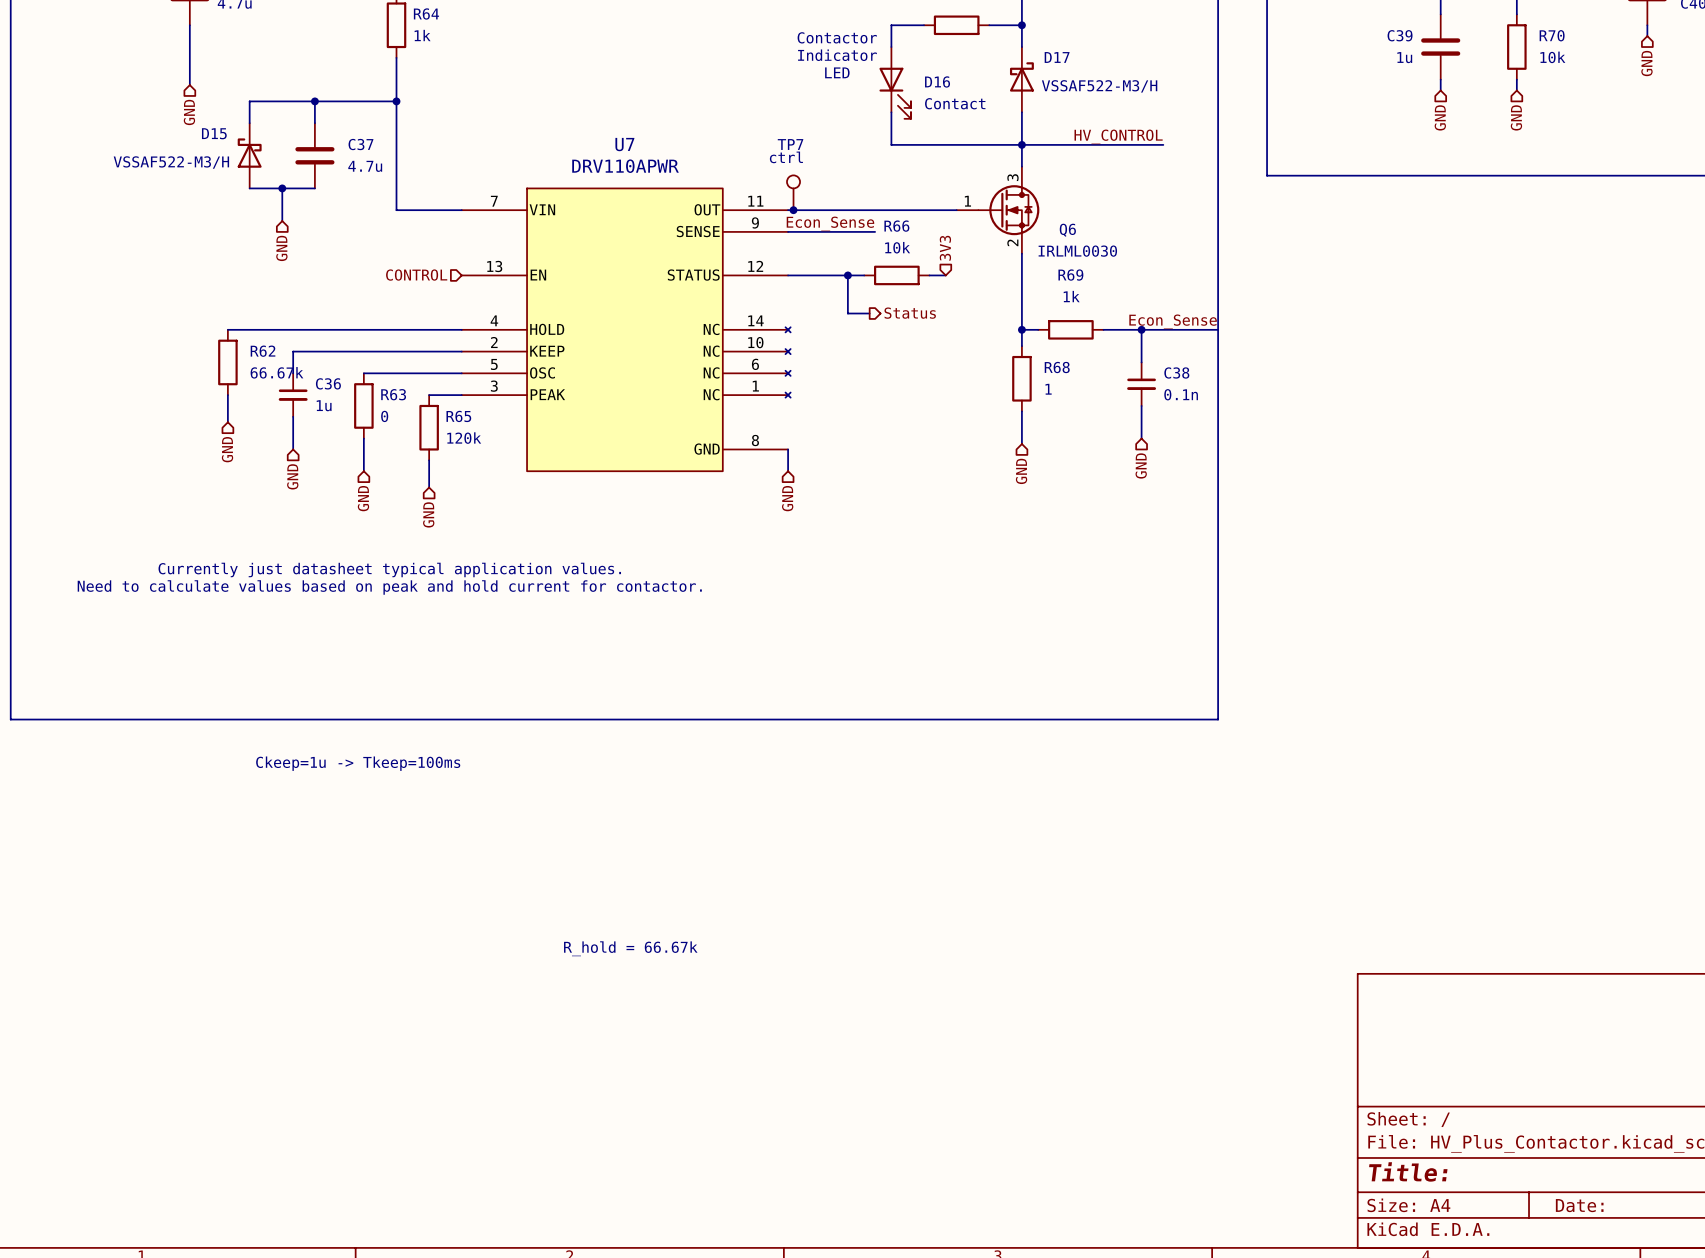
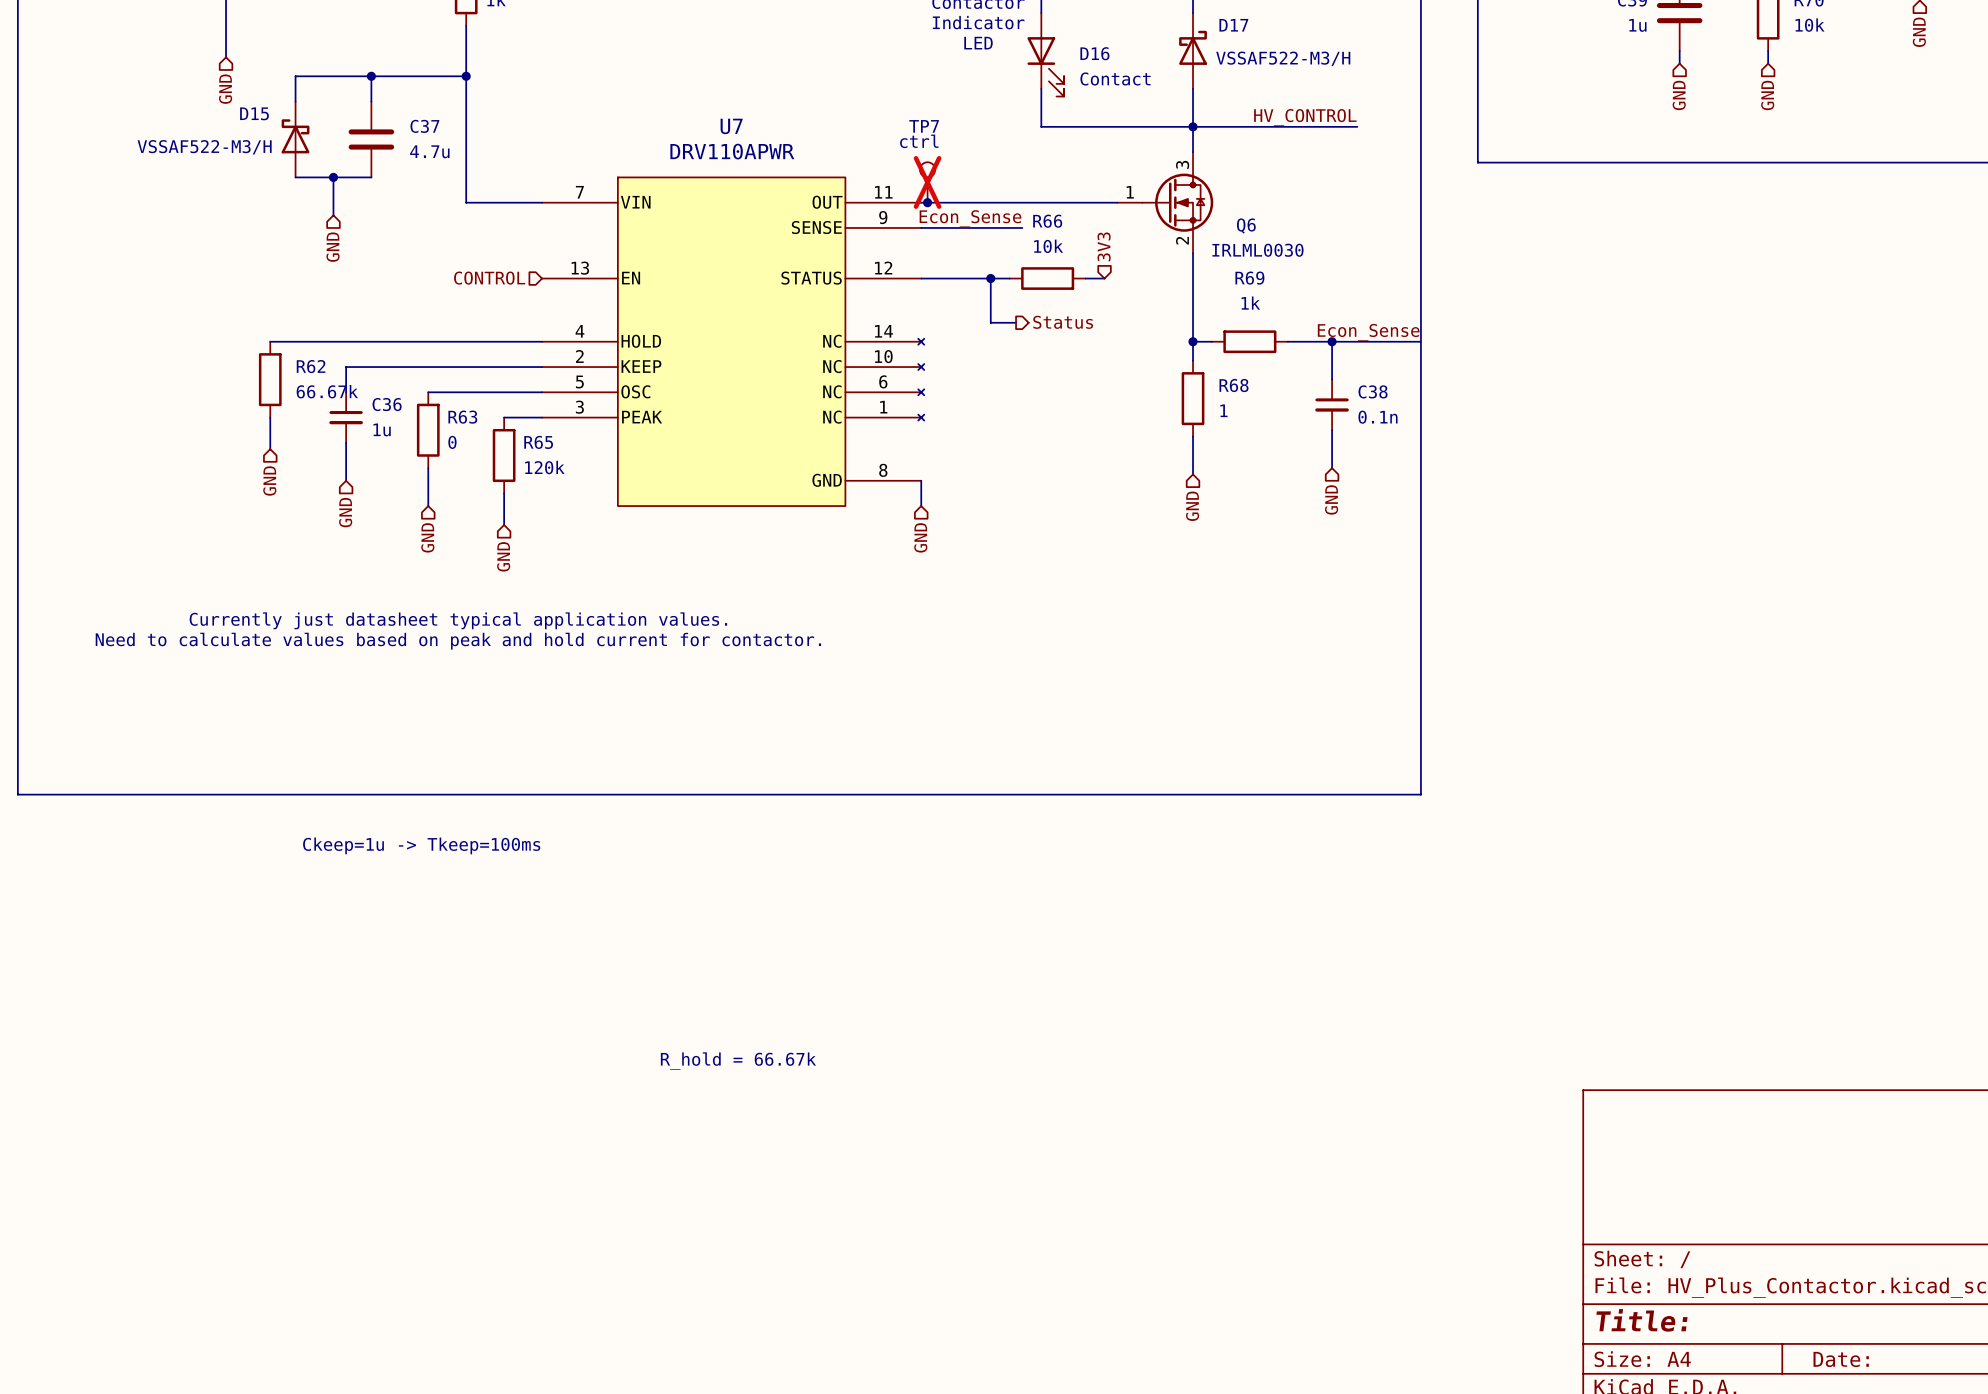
TP7 do-not-place cross: none -> (927, 182)

